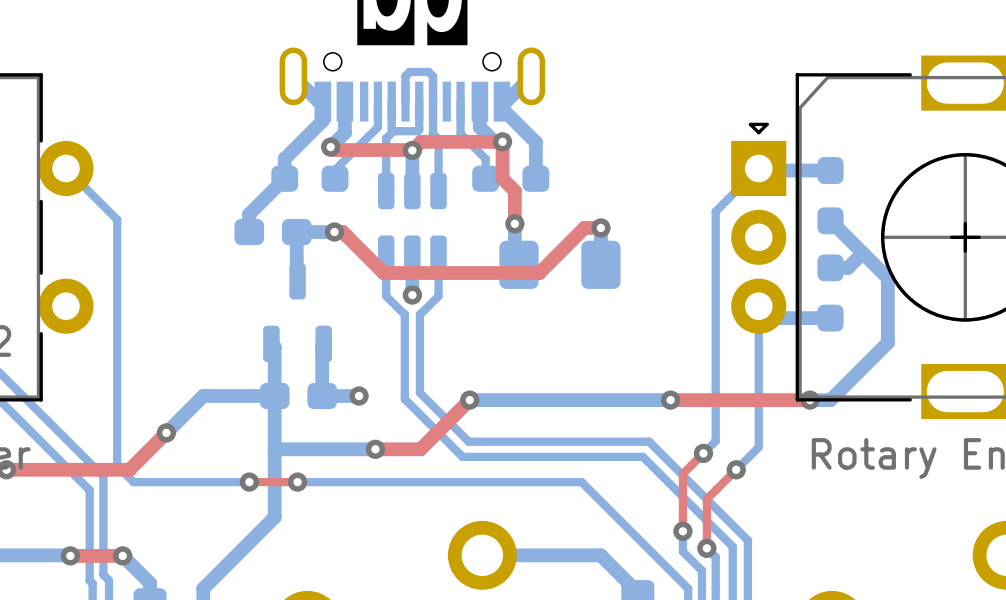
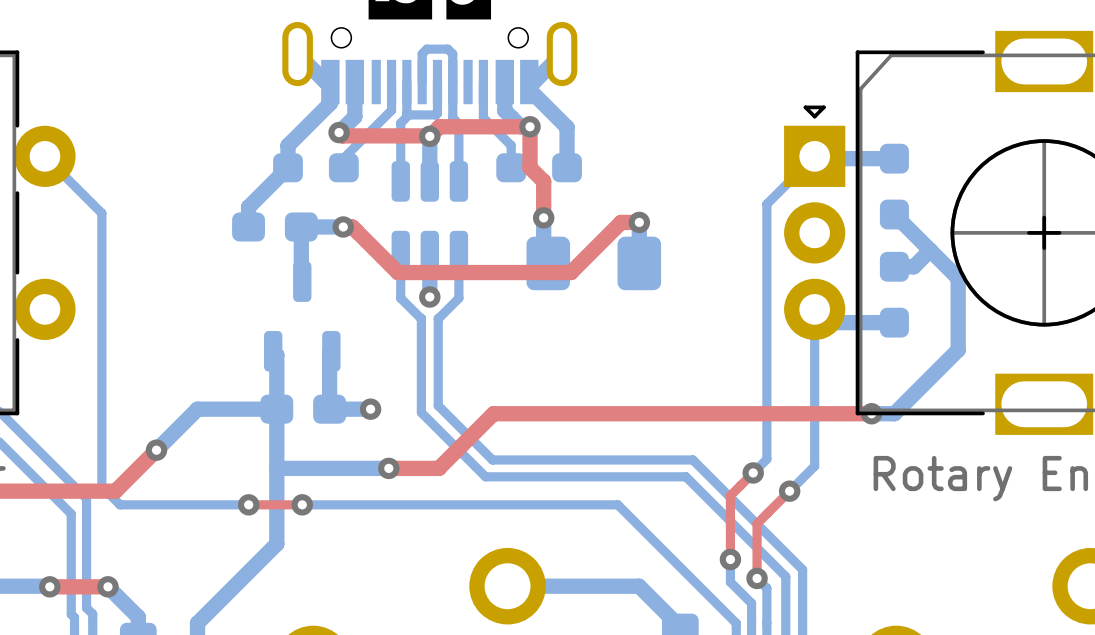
top track: none -> (493, 413) (716, 413)
bottom track: (469, 400) (670, 400) -> none
via: (469, 400) -> none
via: (670, 400) -> none

